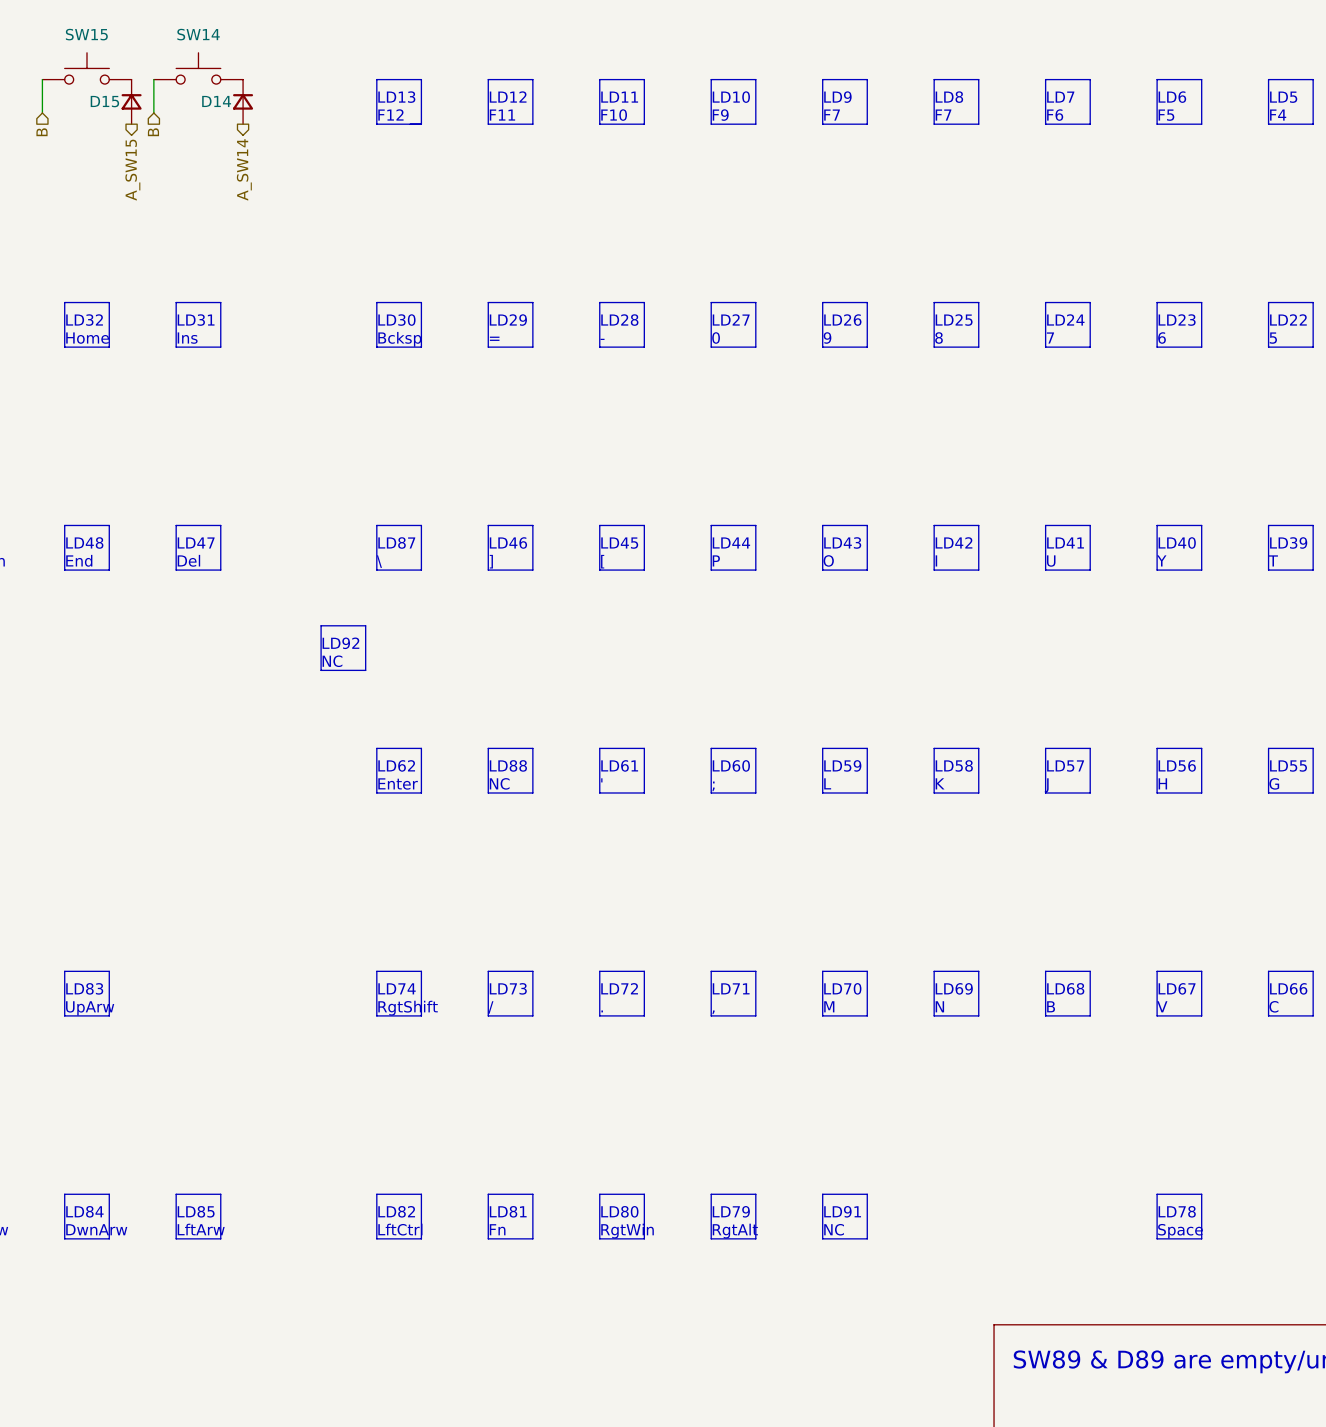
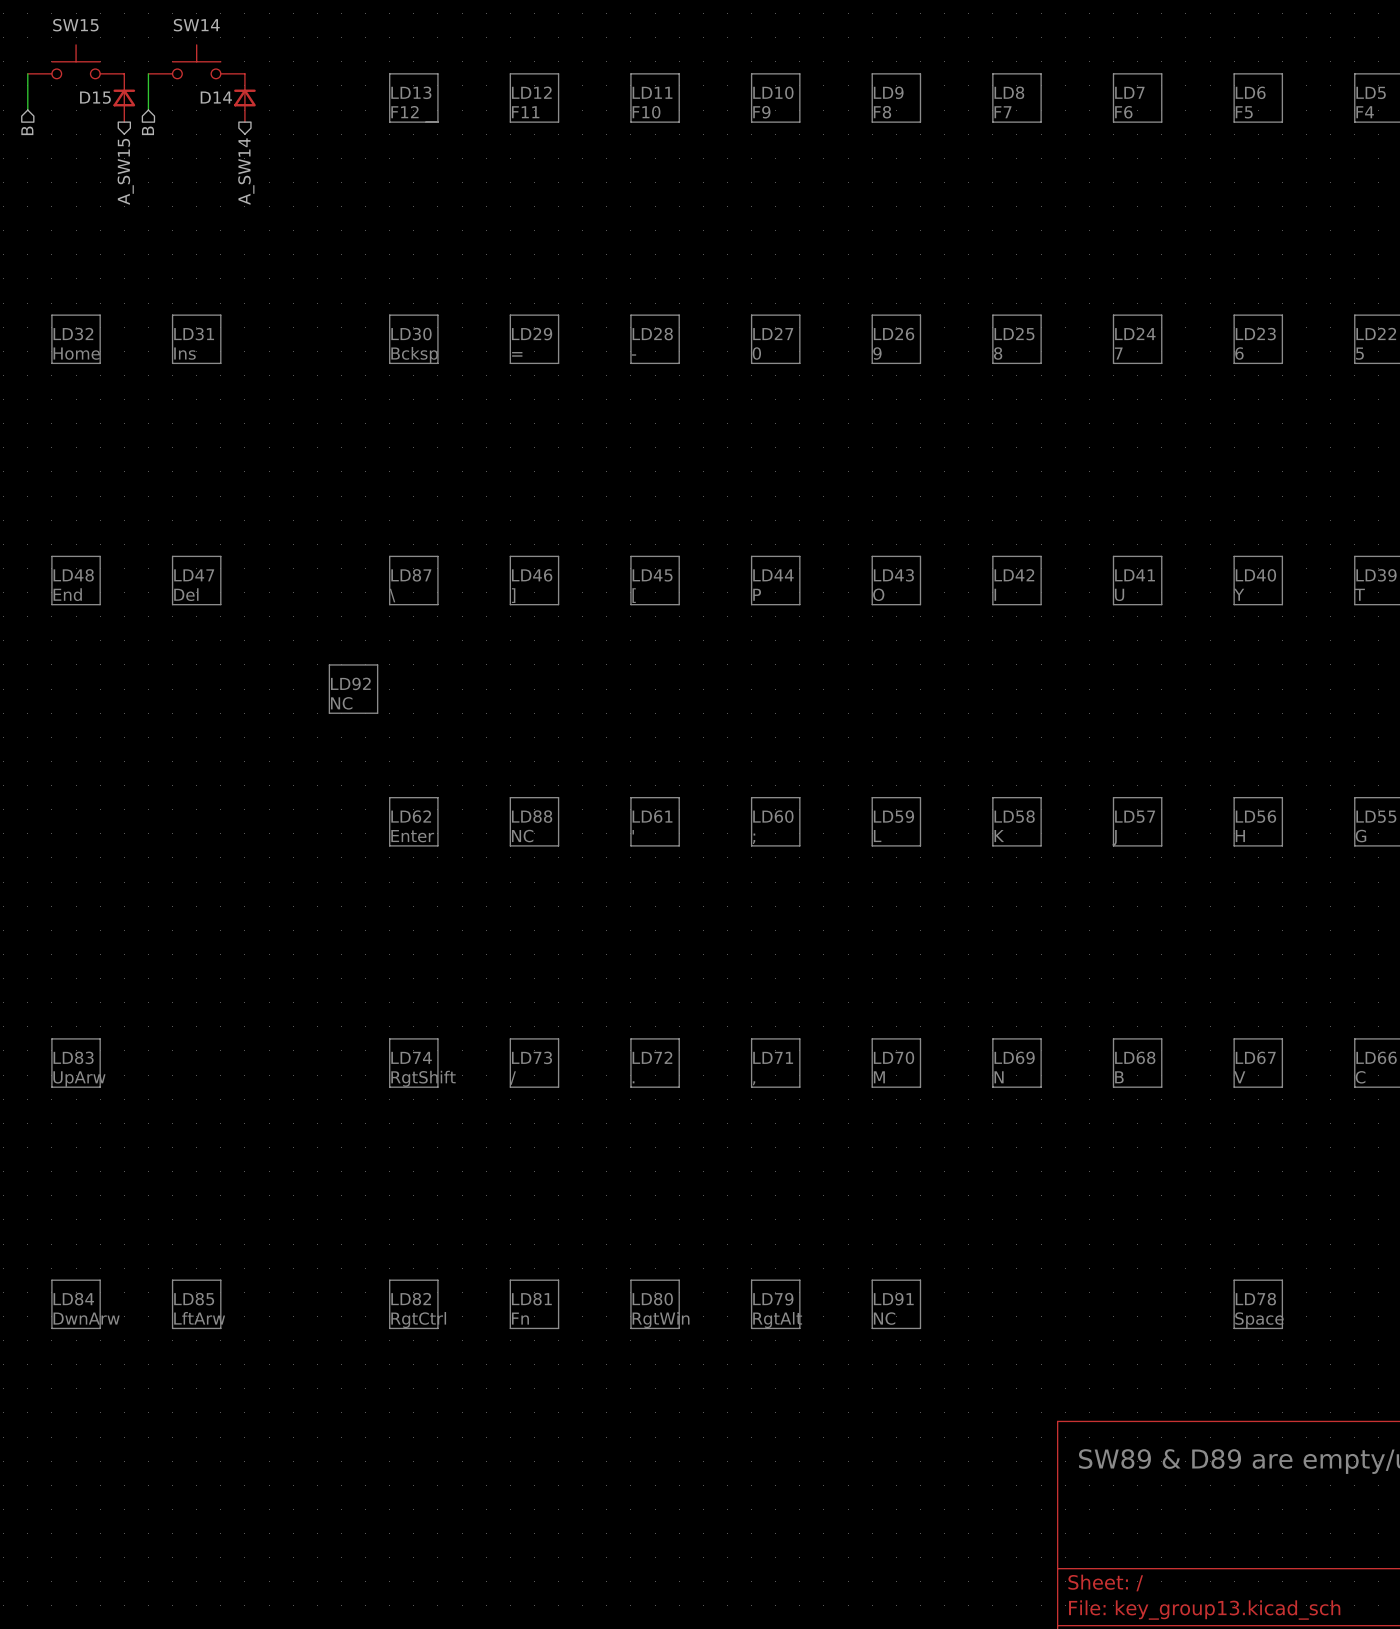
text: F7 (832, 115) -> F8 (882, 112)
text: LftCtrl (400, 1229) -> RgtCtrl (418, 1320)

